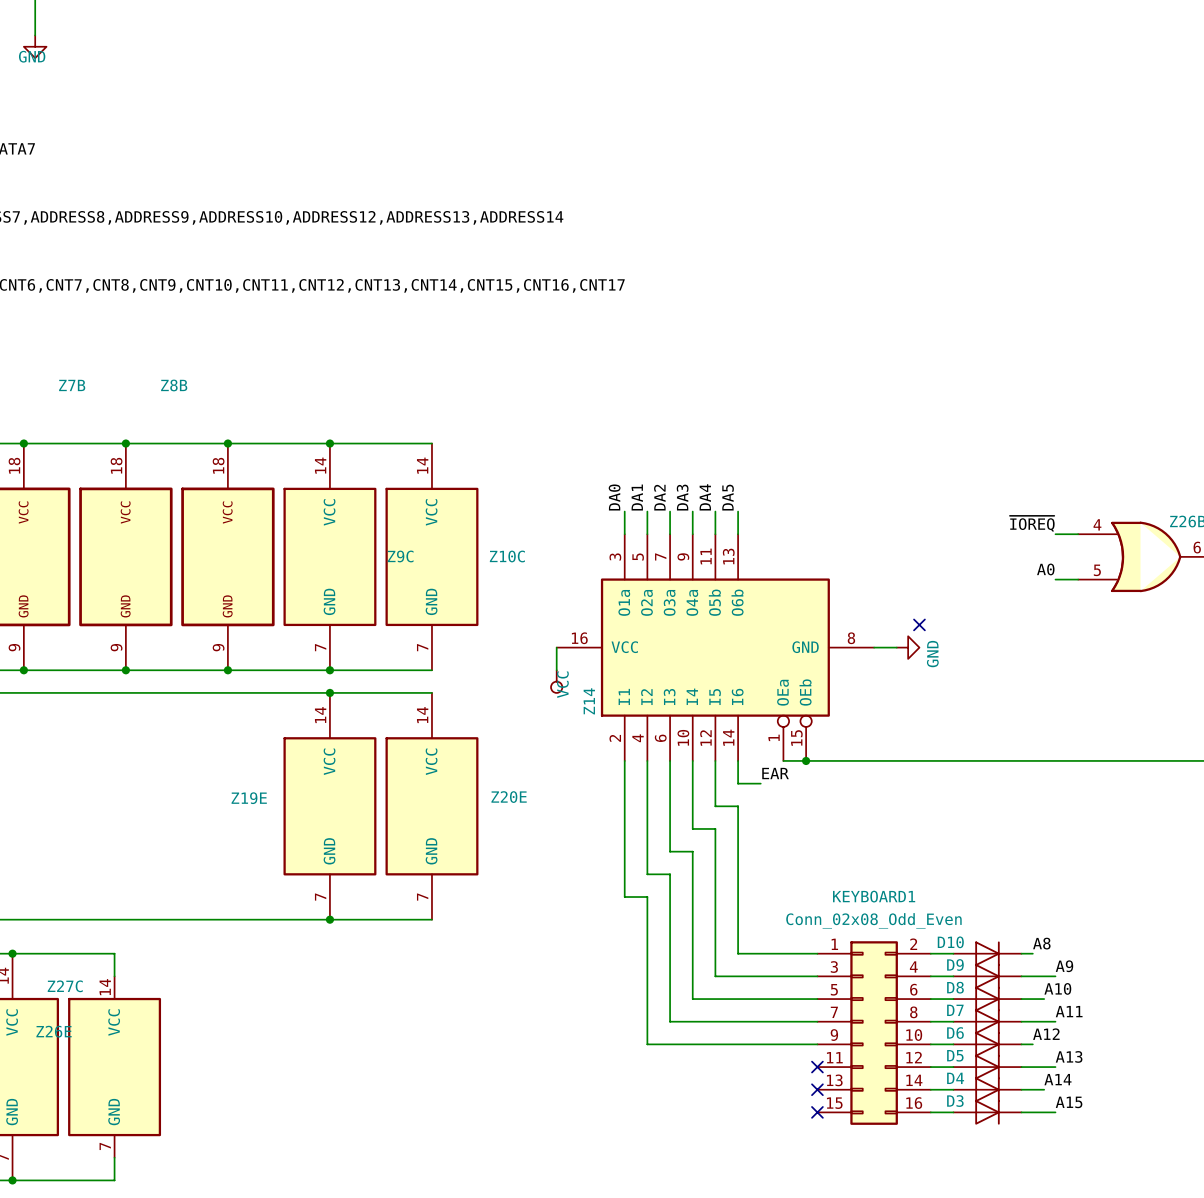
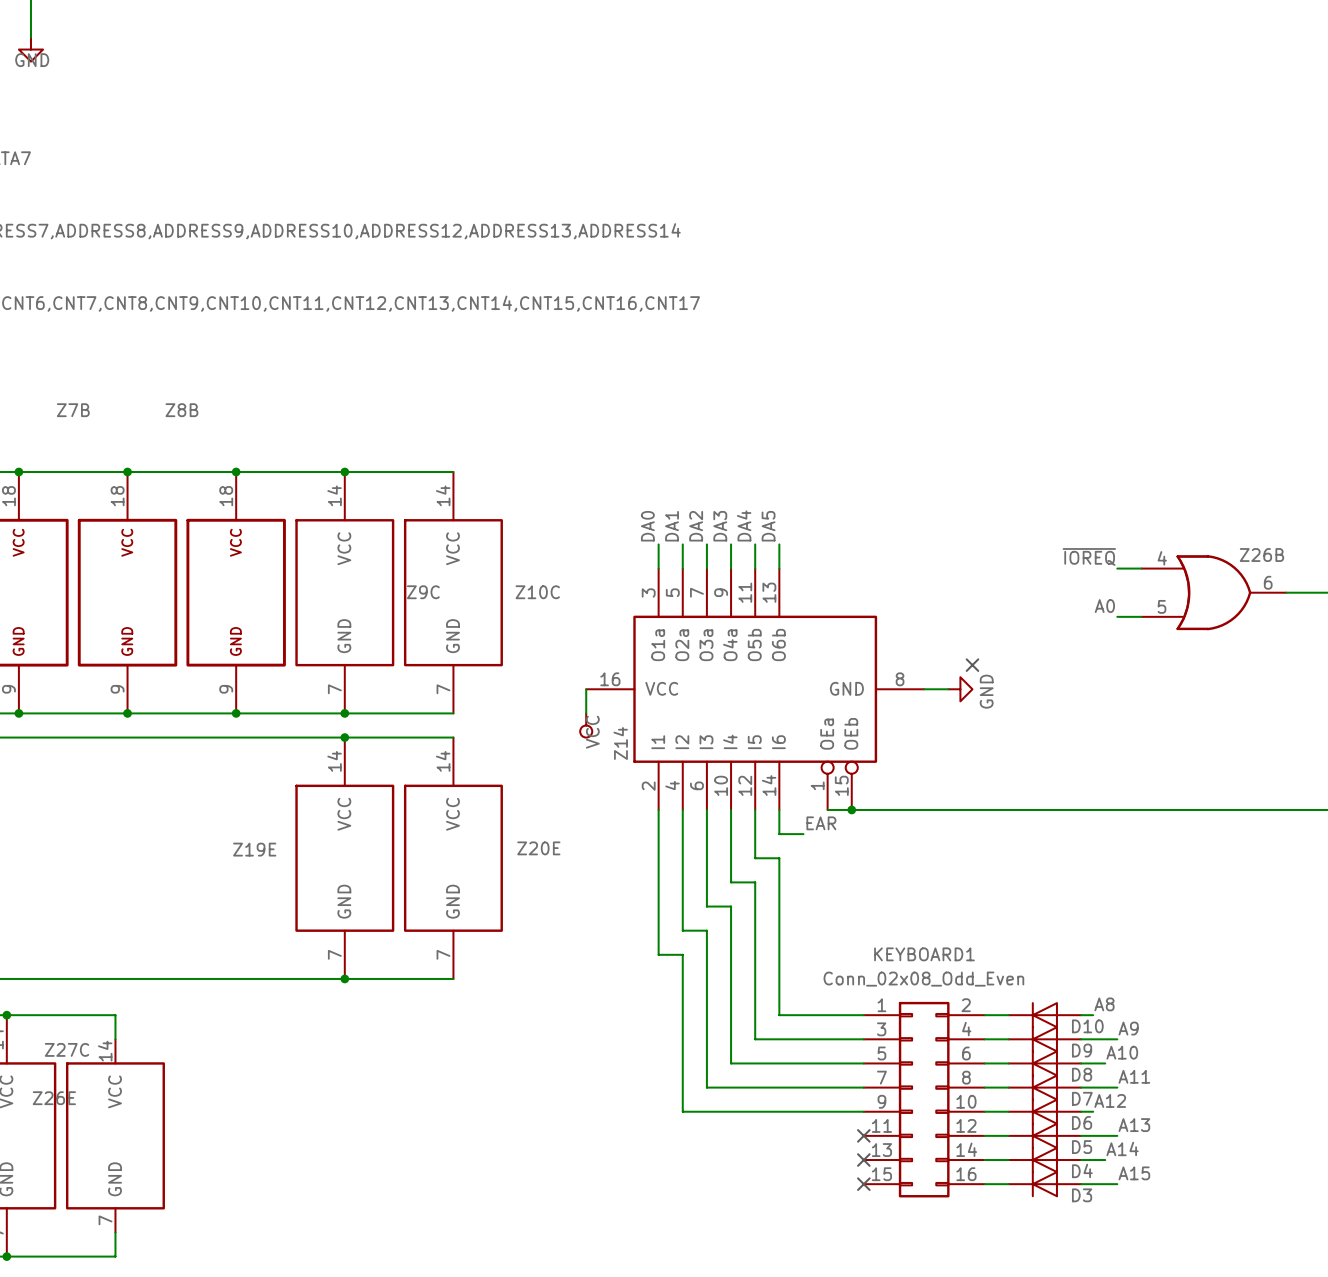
D10 rotation: 0° (987, 953) -> 180° (1044, 1015)
D9 rotation: 0° (987, 976) -> 180° (1044, 1039)
D8 rotation: 0° (987, 999) -> 180° (1044, 1063)
D7 rotation: 0° (987, 1021) -> 180° (1044, 1087)
D6 rotation: 0° (987, 1044) -> 180° (1044, 1111)
D5 rotation: 0° (987, 1067) -> 180° (1044, 1135)
D4 rotation: 0° (987, 1089) -> 180° (1044, 1160)
D3 rotation: 0° (987, 1112) -> 180° (1044, 1184)

